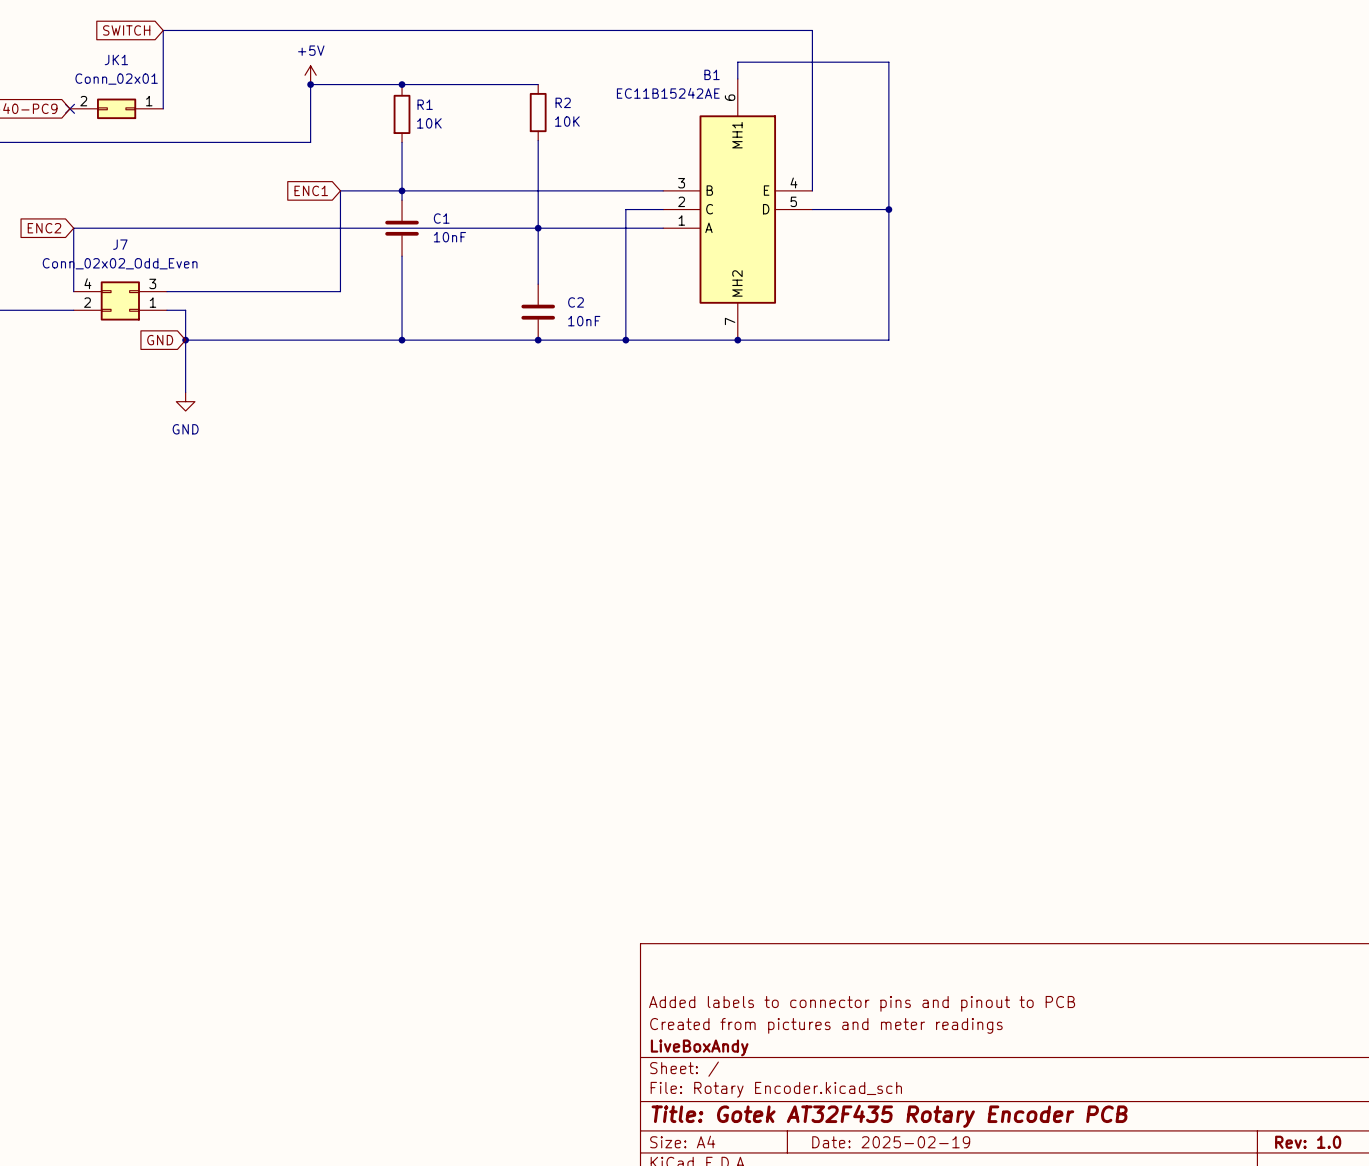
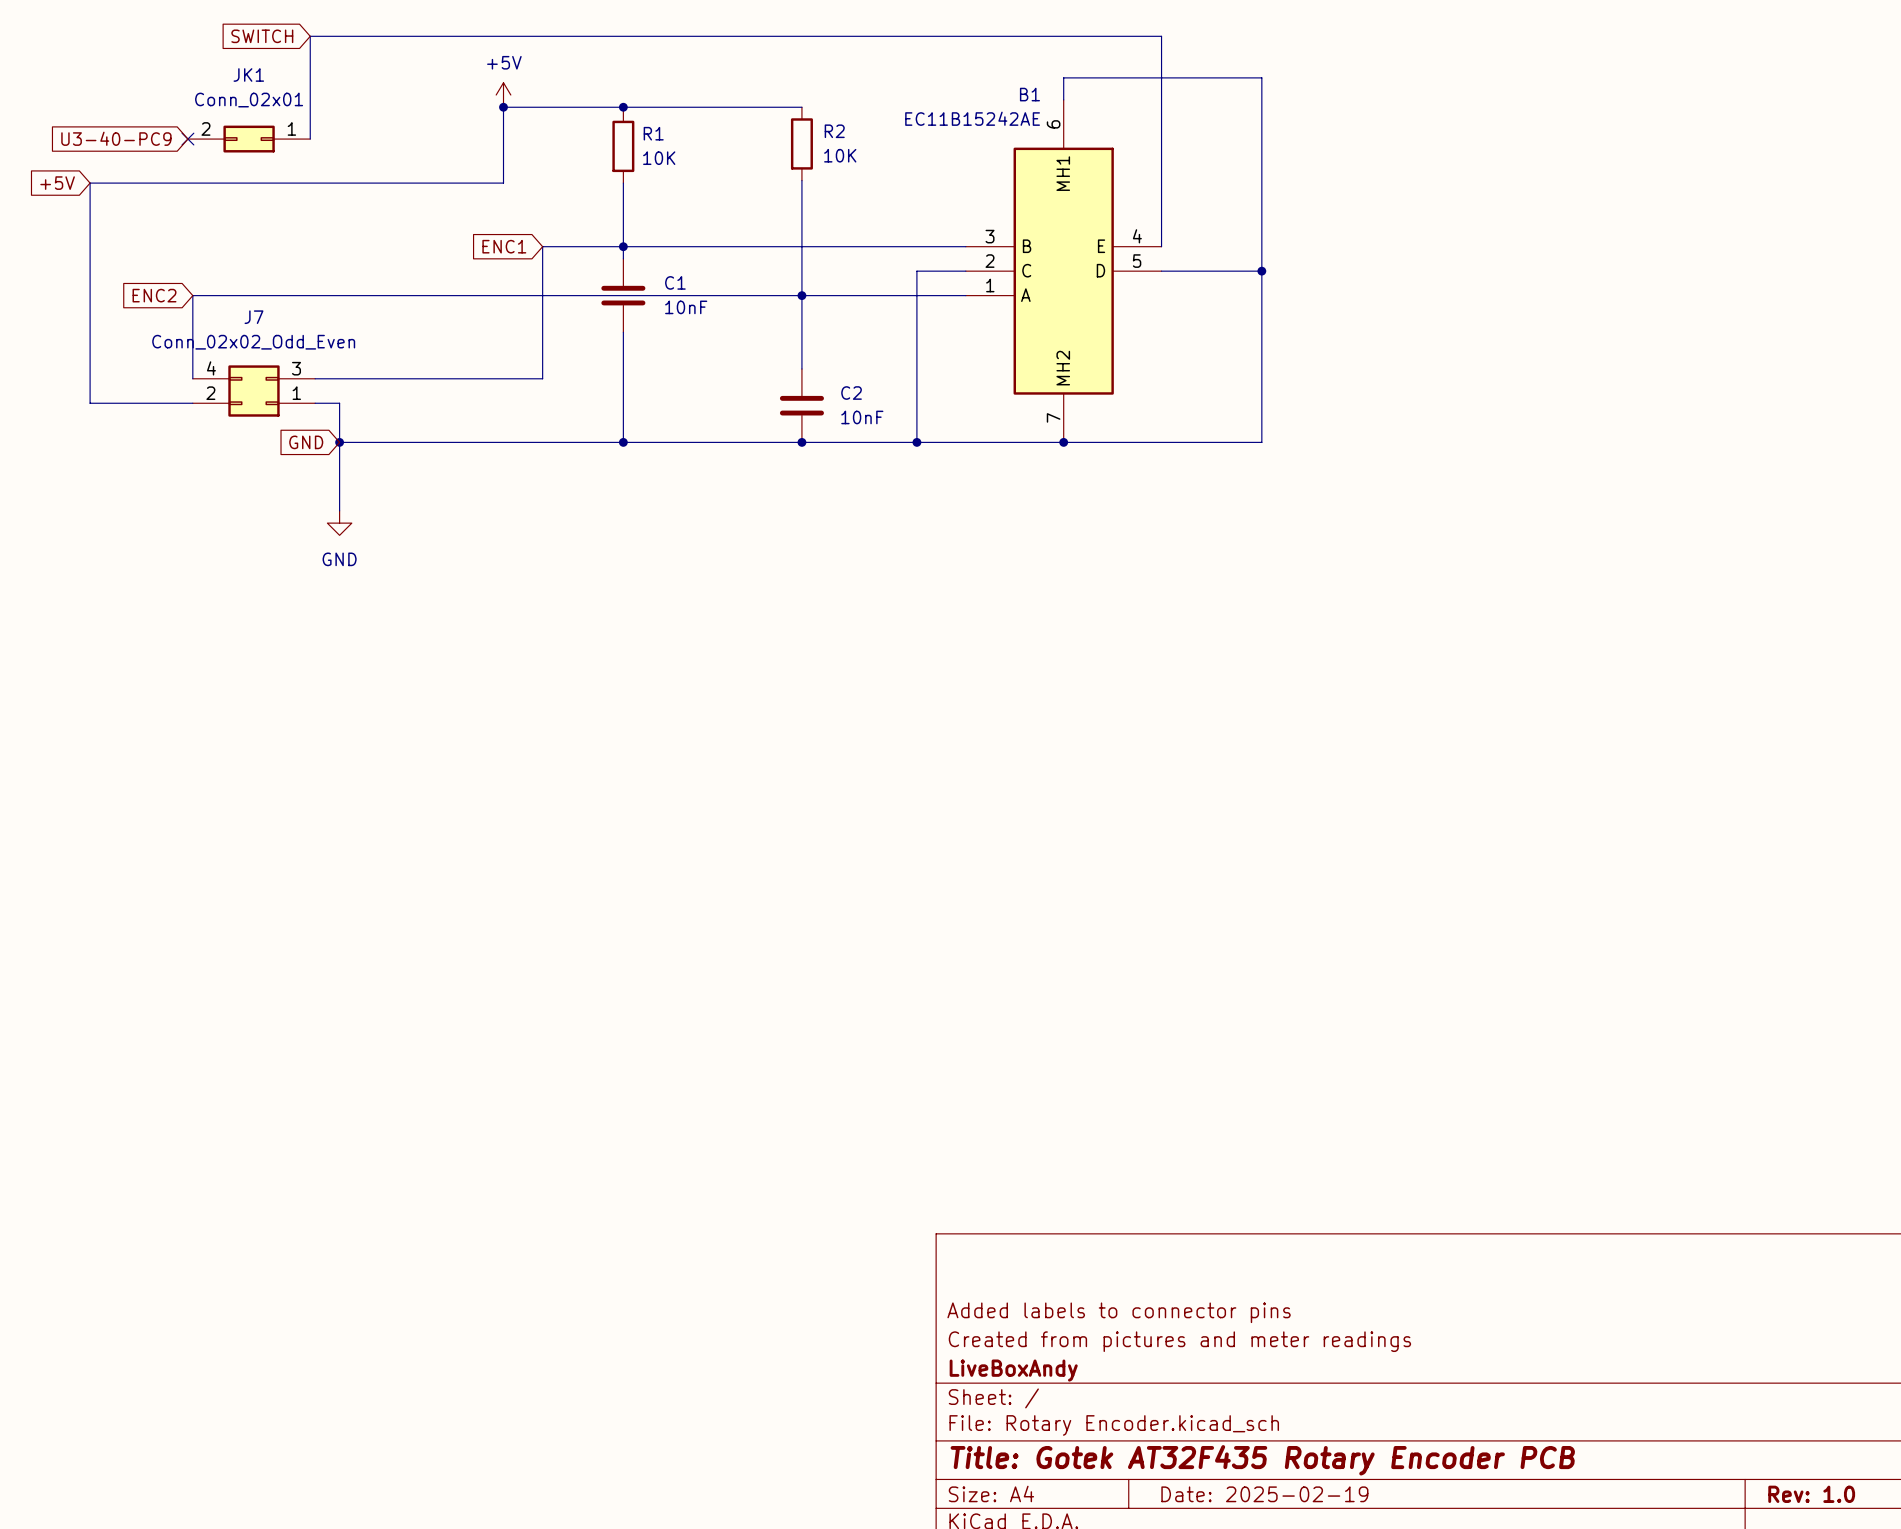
title block: Added labels to connector pins and pinout to PCB (862, 1003) -> Added labels to connector pins (1119, 1312)

